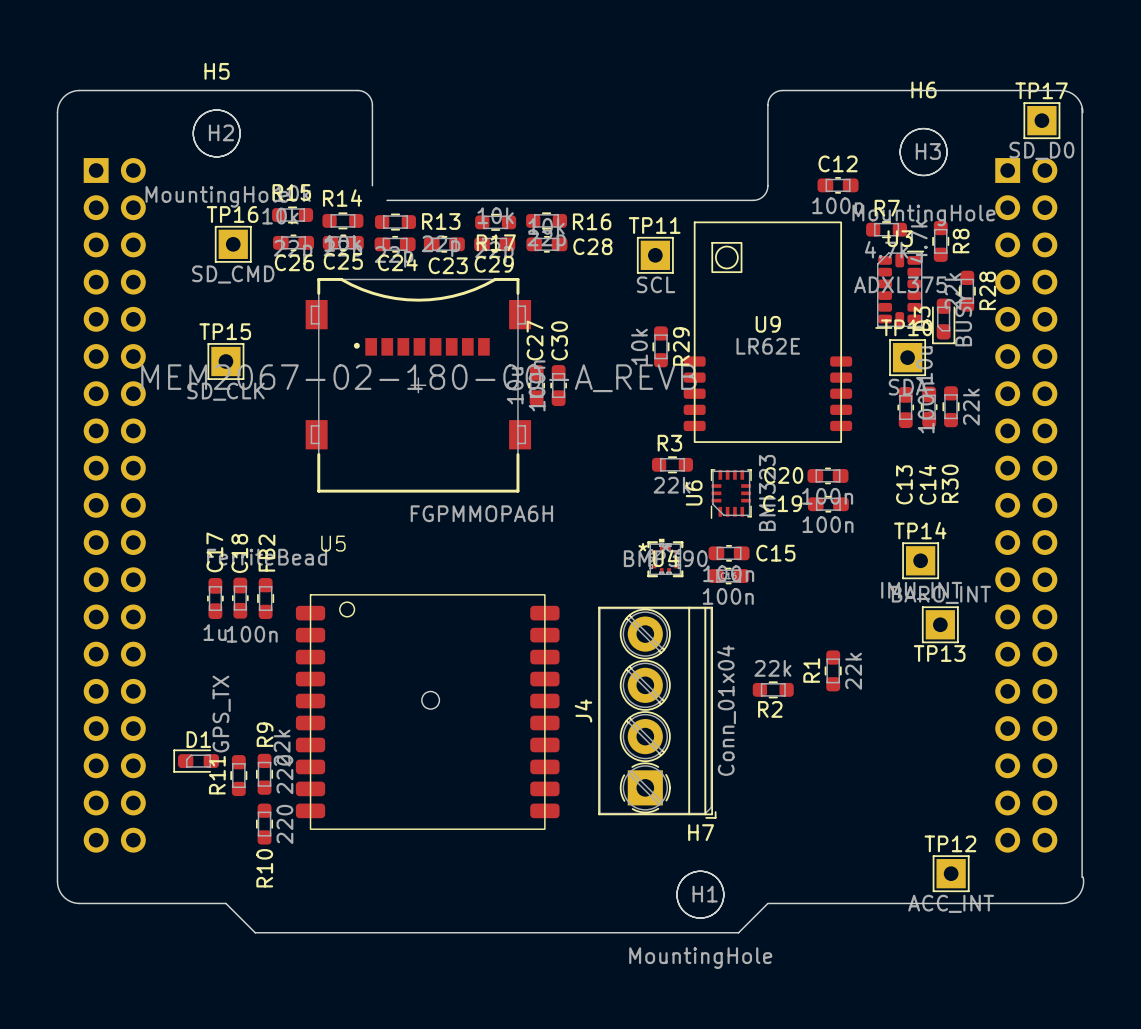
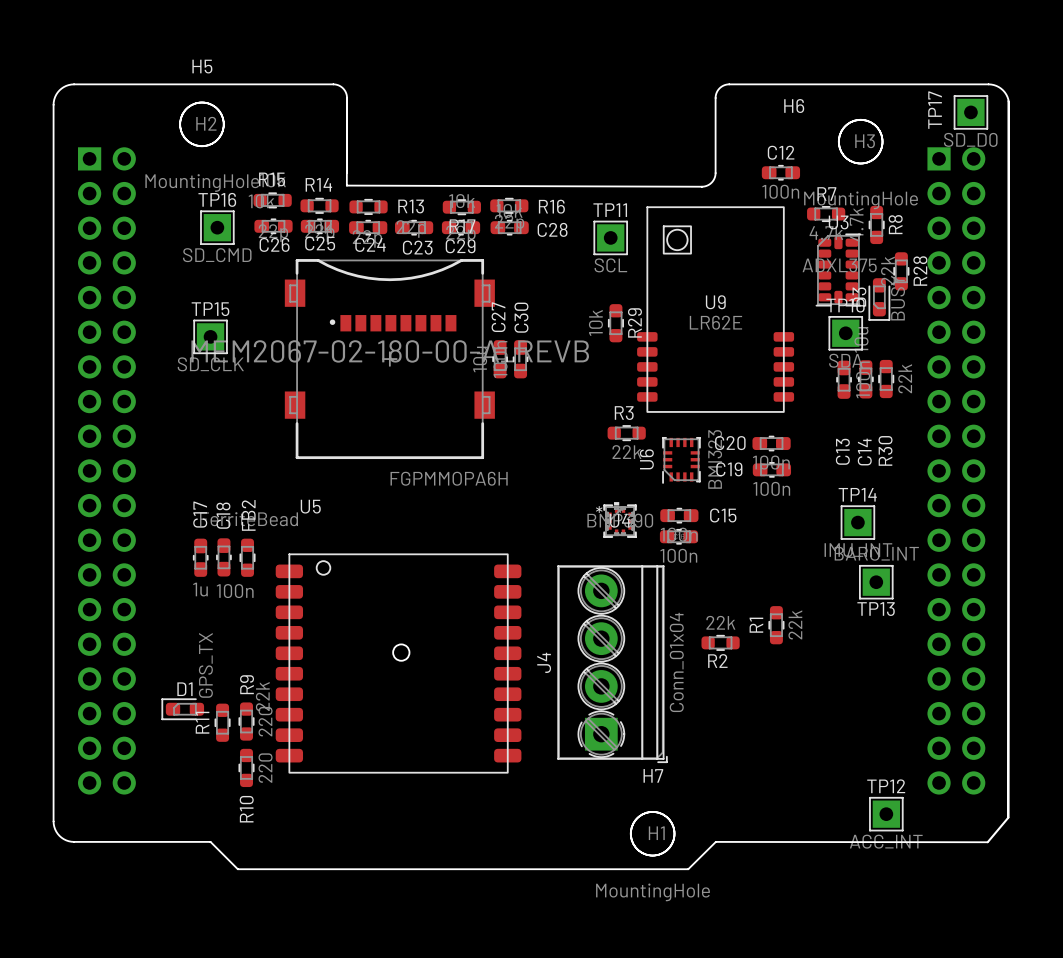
H6 name position: H6 (923, 89) -> H6 (794, 106)
TP17 name rotation: 0° (1041, 90) -> 90° counterclockwise (935, 110)
board edge: (387, 200) (753, 200) -> (347, 98) (346, 185) (701, 186)
board edge: (1083, 877) (1083, 885) (1080, 893) (1074, 899) (1063, 903) (768, 903) -> none
board edge: (767, 903) (738, 932) -> (1009, 104) (1008, 817) (987, 842) (715, 841) (688, 869)

